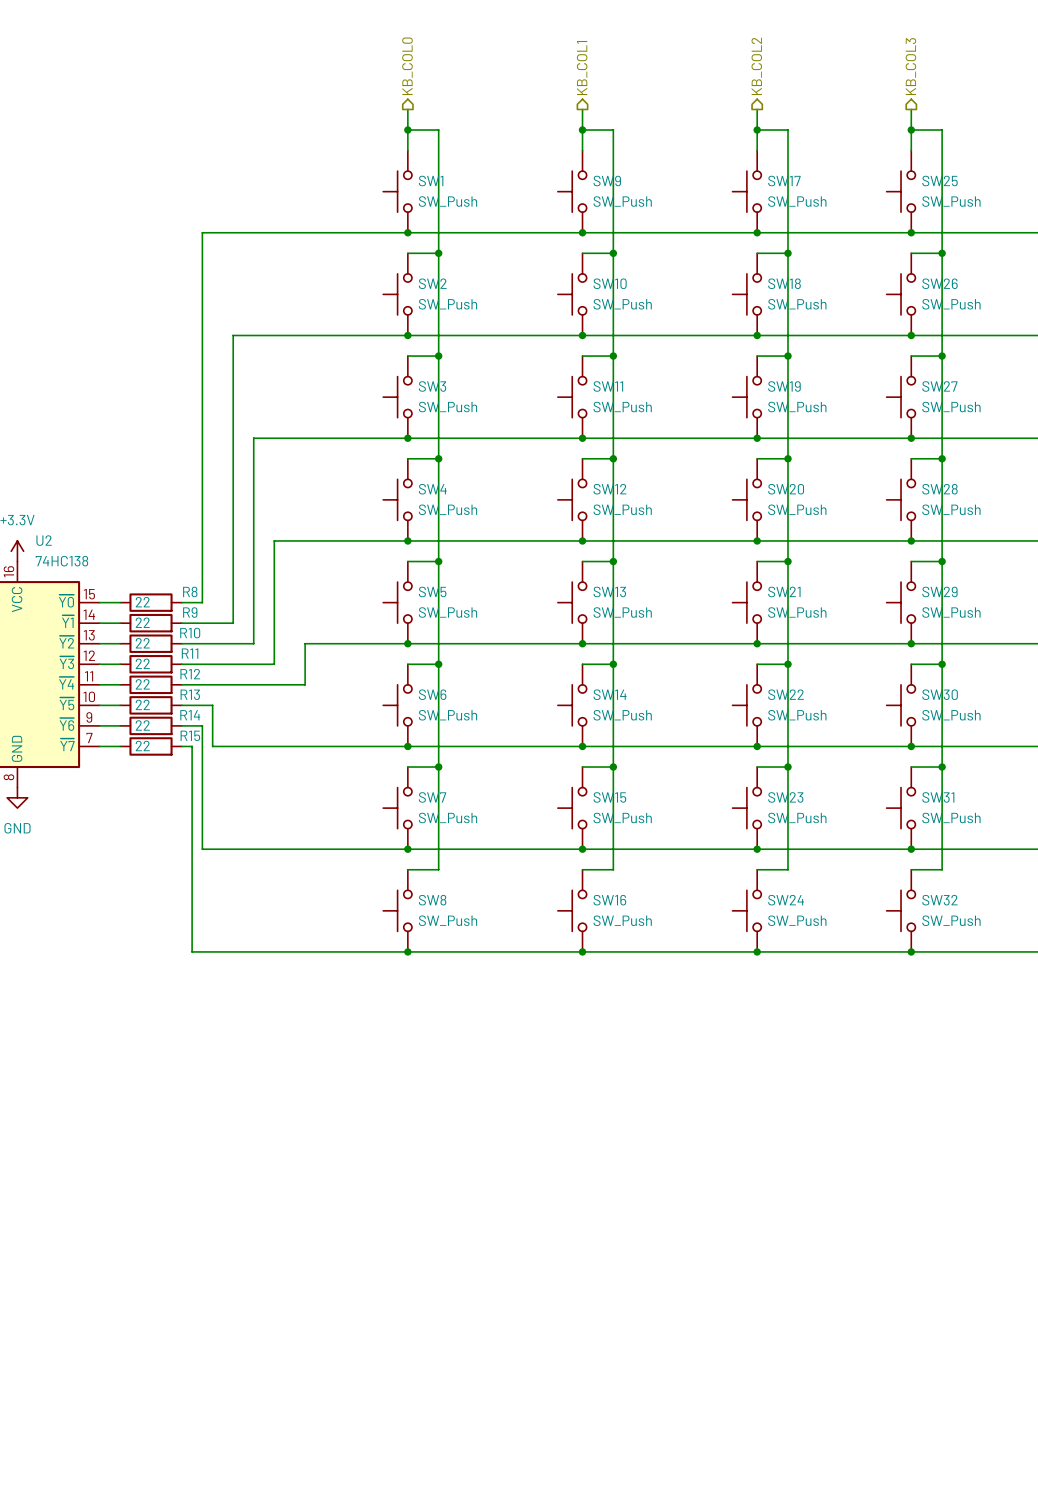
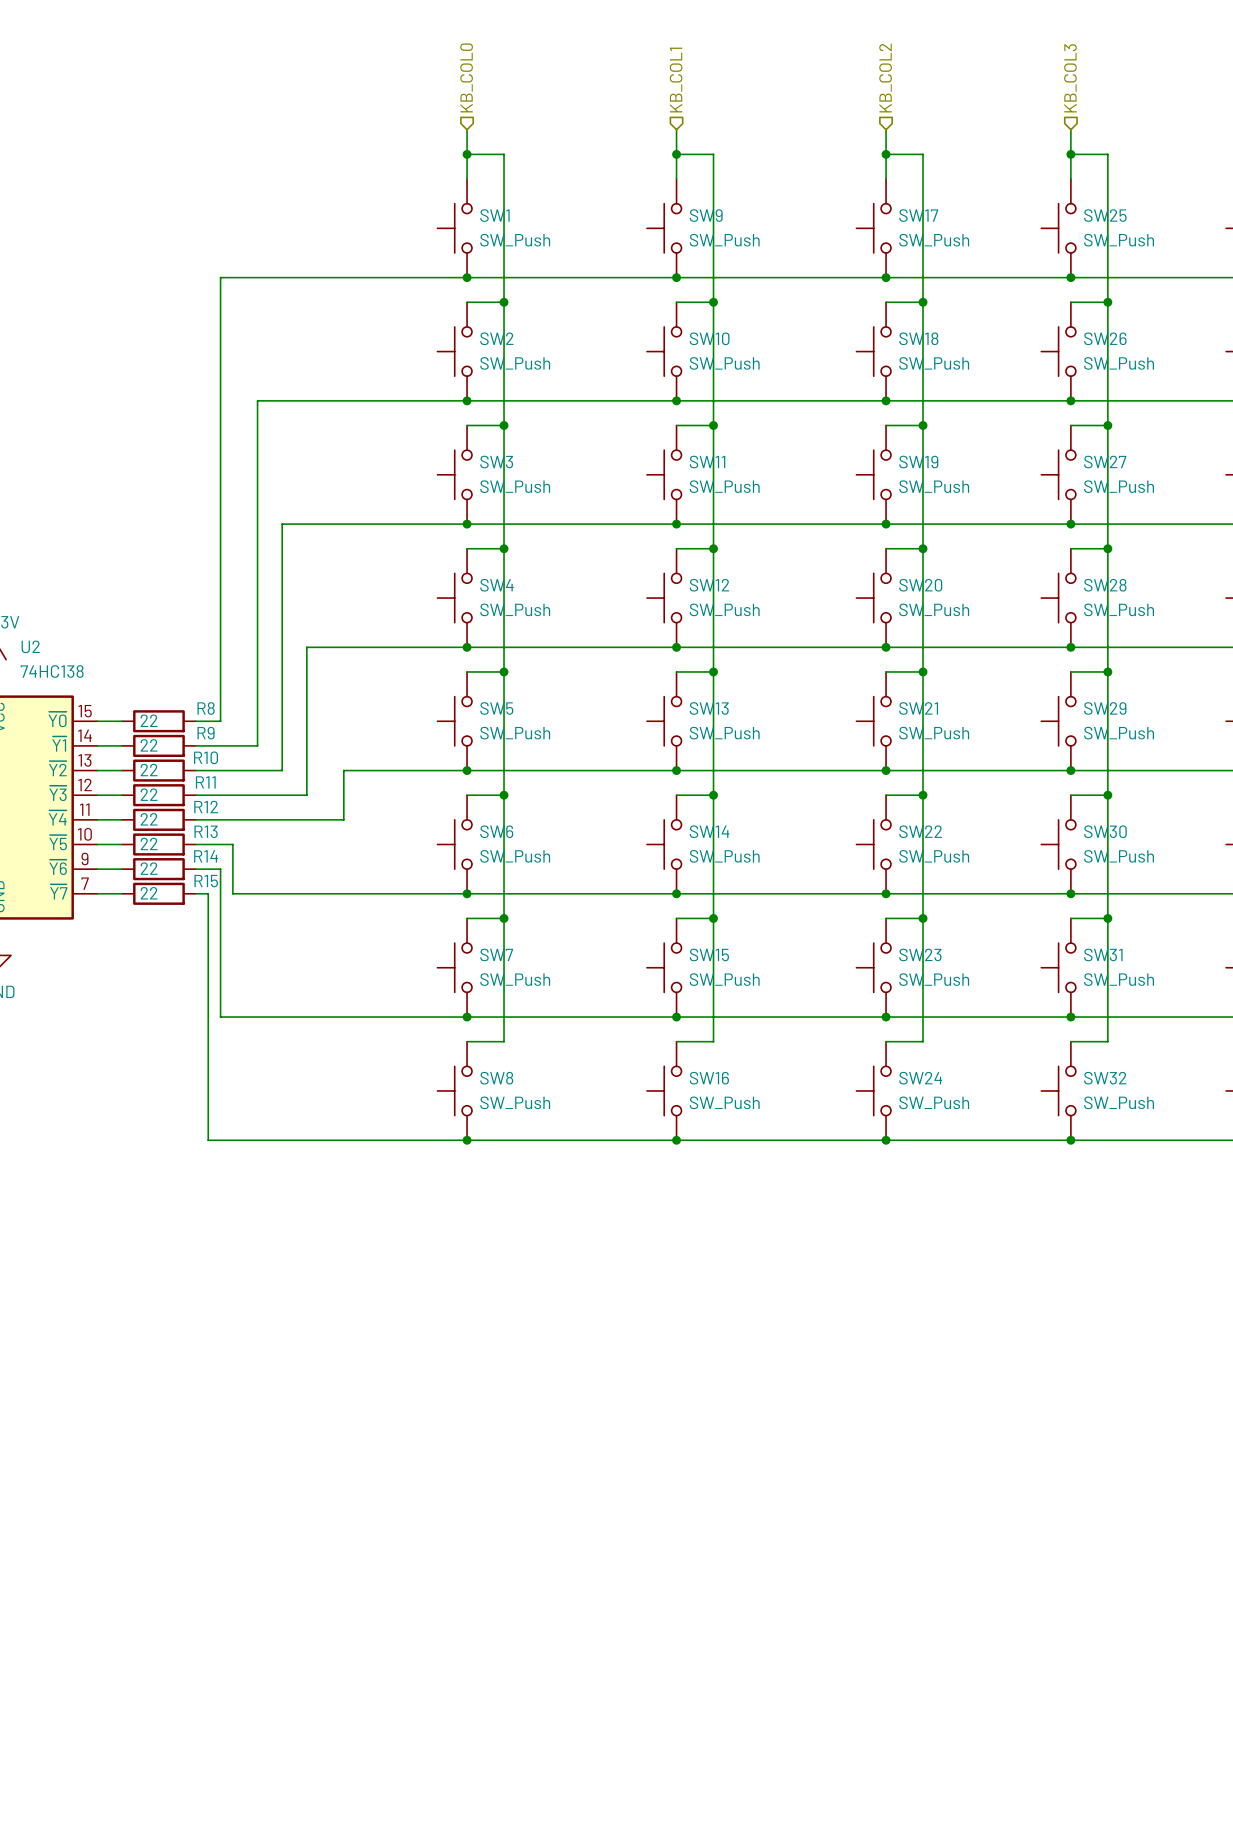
hierarchical label shape: output (407, 66) -> input (466, 77)
hierarchical label shape: output (756, 66) -> input (885, 78)
hierarchical label shape: output (910, 66) -> input (1070, 78)
hierarchical label shape: output (582, 68) -> input (676, 80)

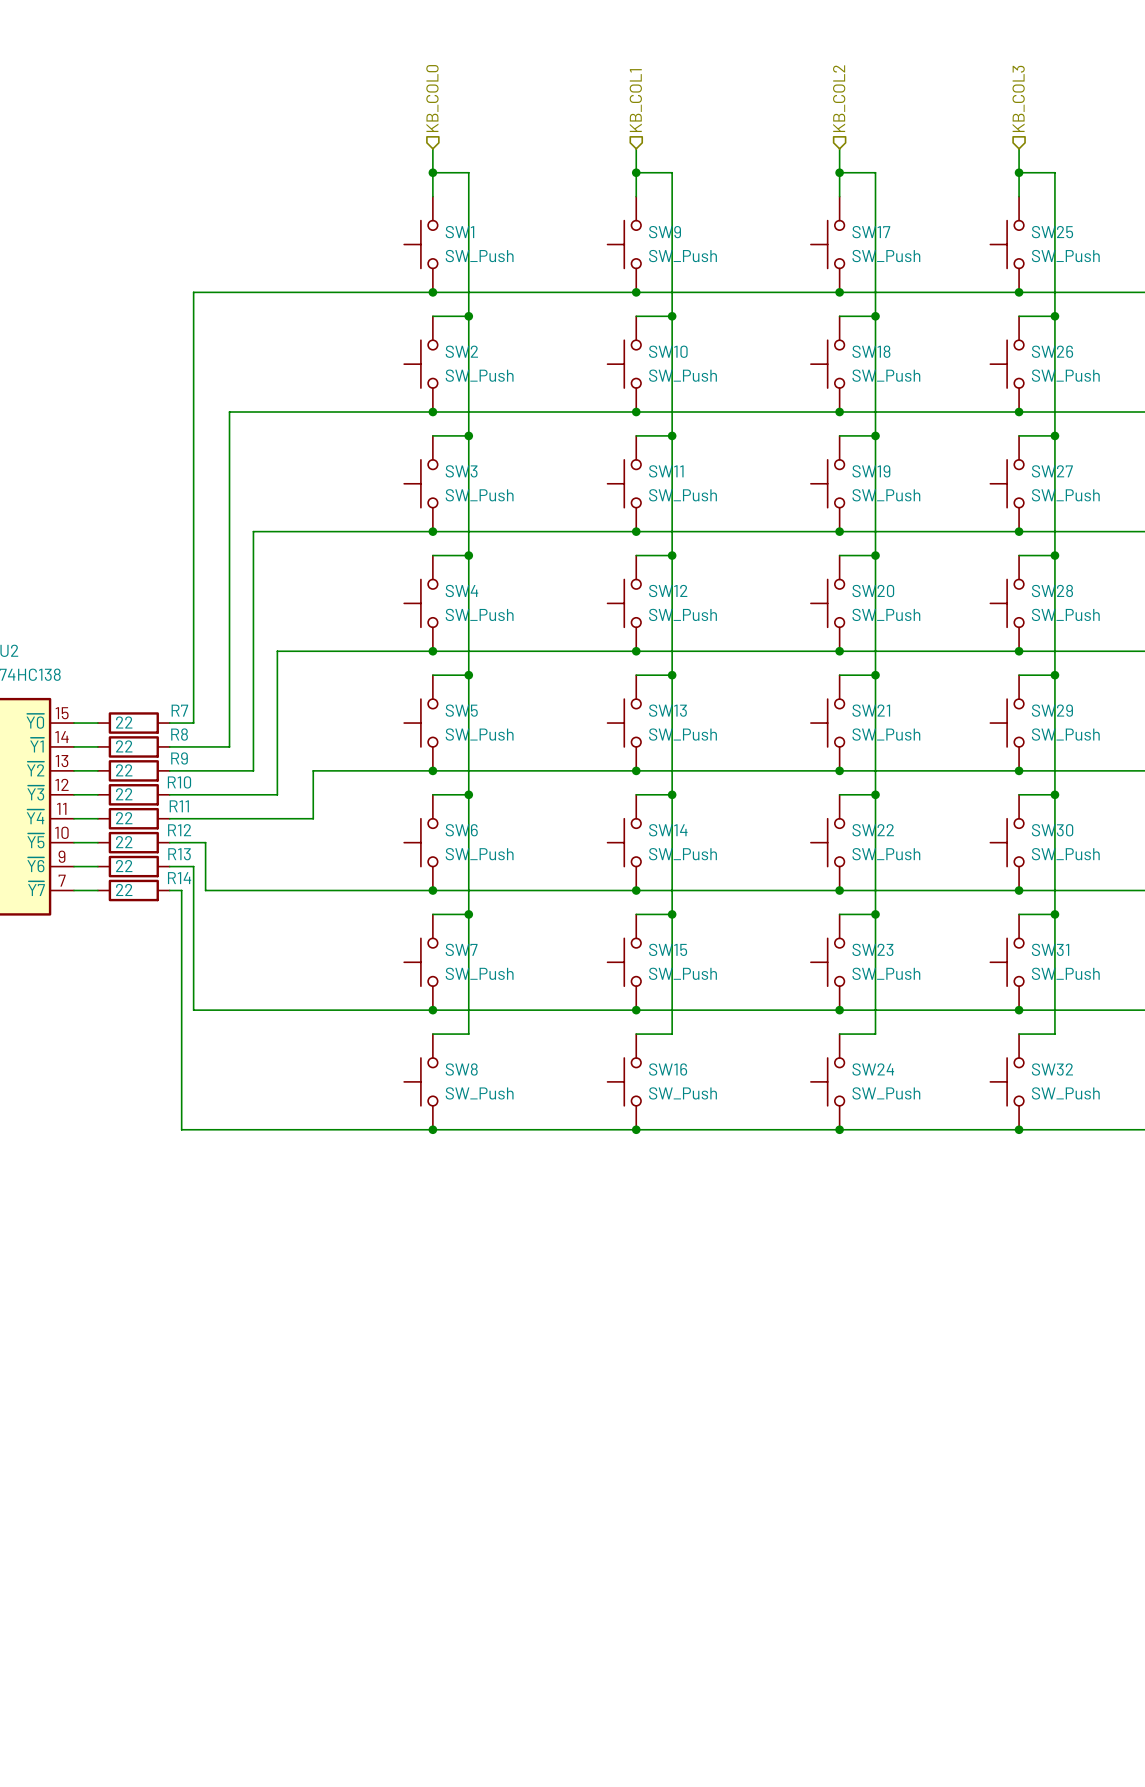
R8 name: R8 (206, 708) -> R7 (179, 710)
R9 name: R9 (206, 733) -> R8 (179, 734)
R10 name: R10 (205, 757) -> R9 (179, 758)
R11 name: R11 (205, 782) -> R10 (179, 782)
R12 name: R12 (206, 807) -> R11 (179, 806)
R13 name: R13 (206, 831) -> R12 (179, 830)
R14 name: R14 (206, 856) -> R13 (179, 854)
R15 name: R15 (206, 881) -> R14 (179, 878)

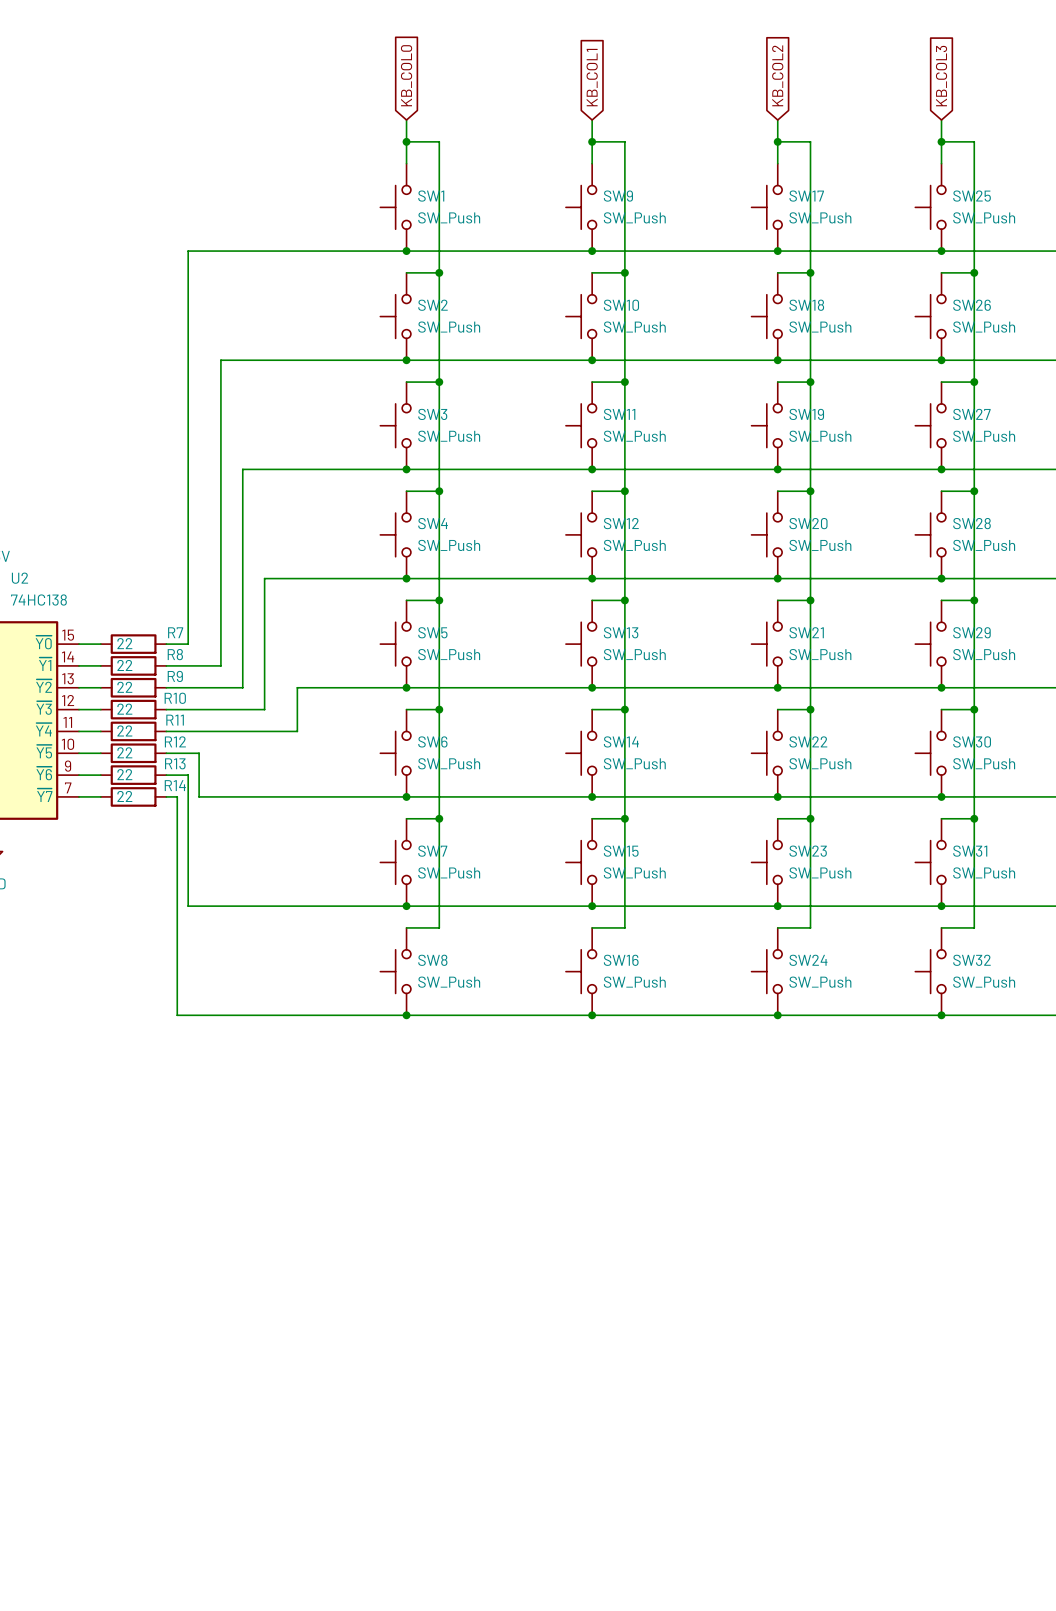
hierarchical label: KB_COL0 (432, 98) -> none
hierarchical label: KB_COL2 (839, 98) -> none
hierarchical label: KB_COL3 (1018, 98) -> none
global label: none -> KB_COL0 (406, 75)
hierarchical label: KB_COL1 (635, 100) -> none
global label: none -> KB_COL2 (777, 75)
global label: none -> KB_COL3 (941, 76)
global label: none -> KB_COL1 (592, 77)

